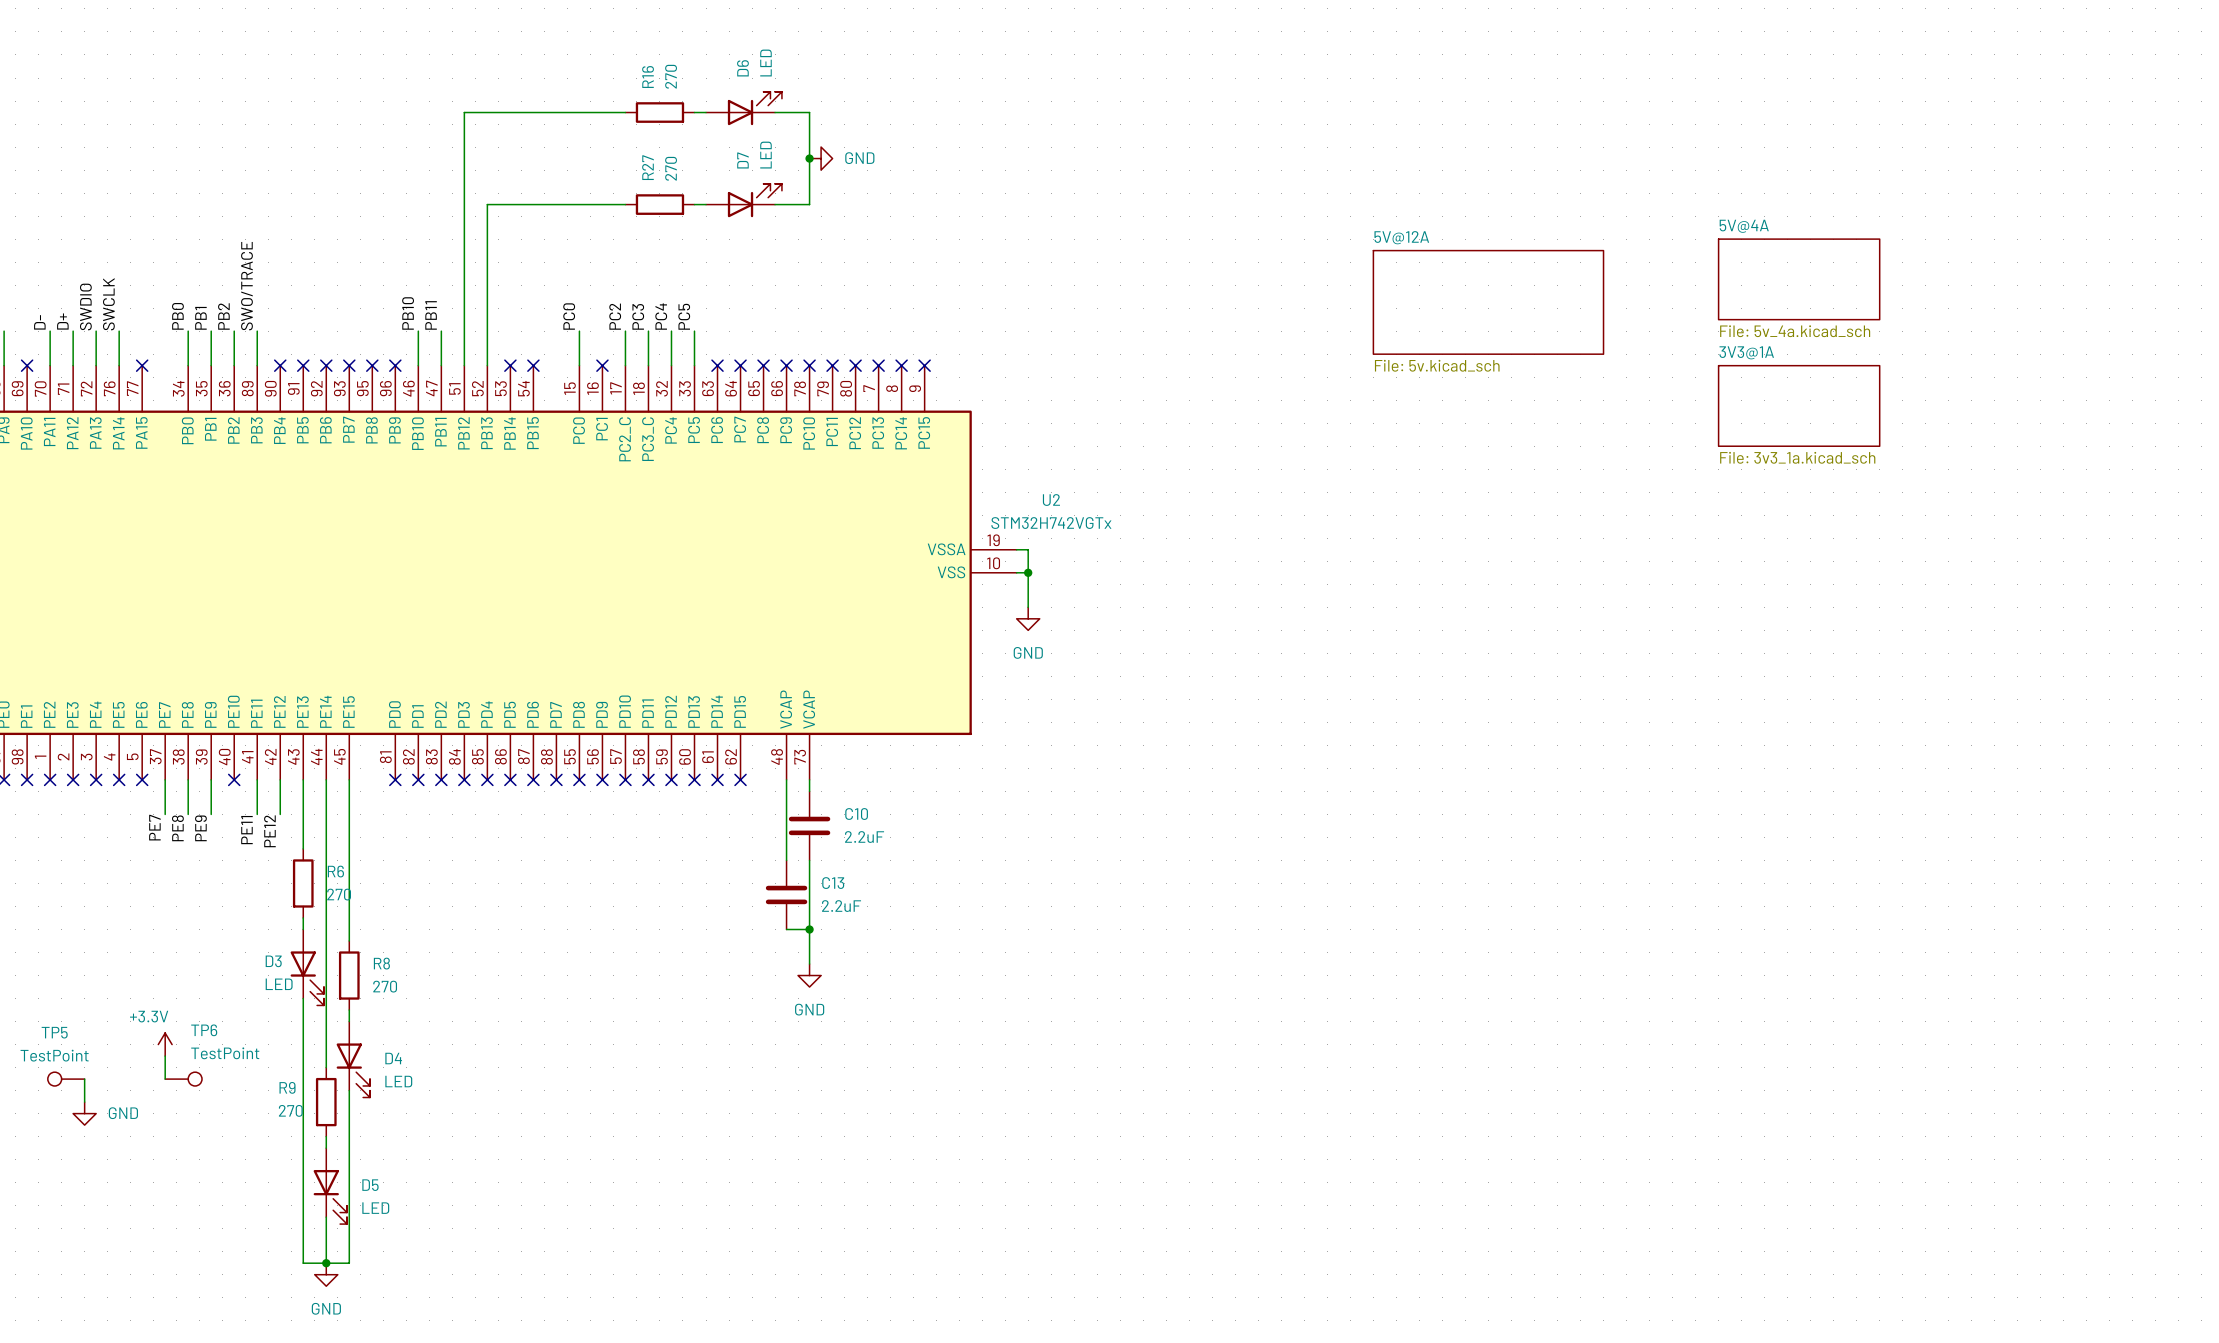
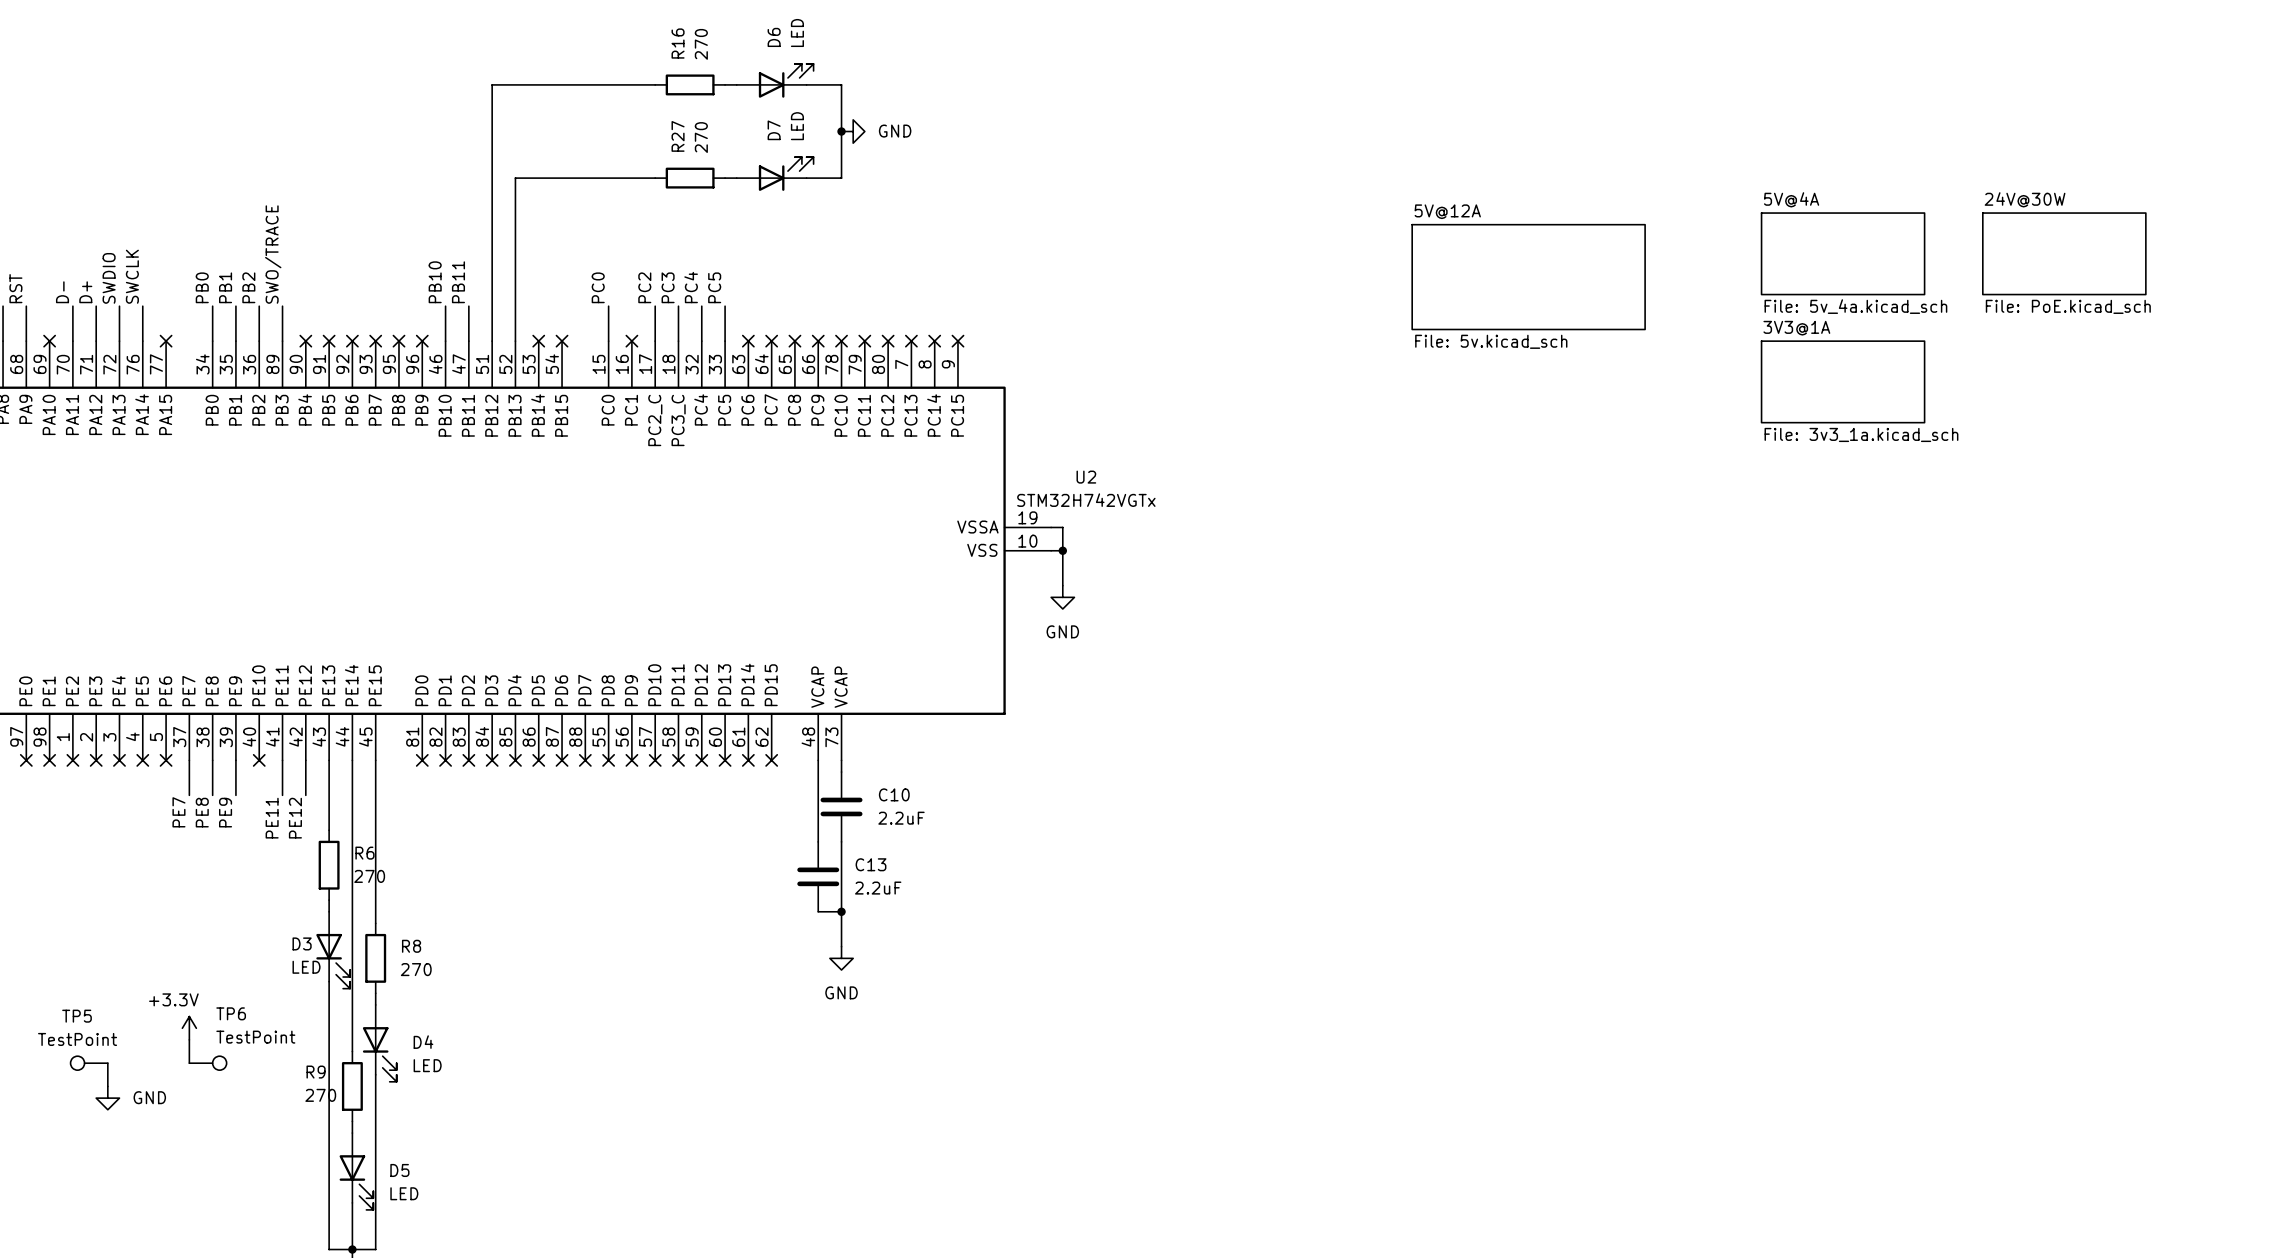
sheet 24V@30W: none -> File: PoE.kicad_sch (2064, 253)

